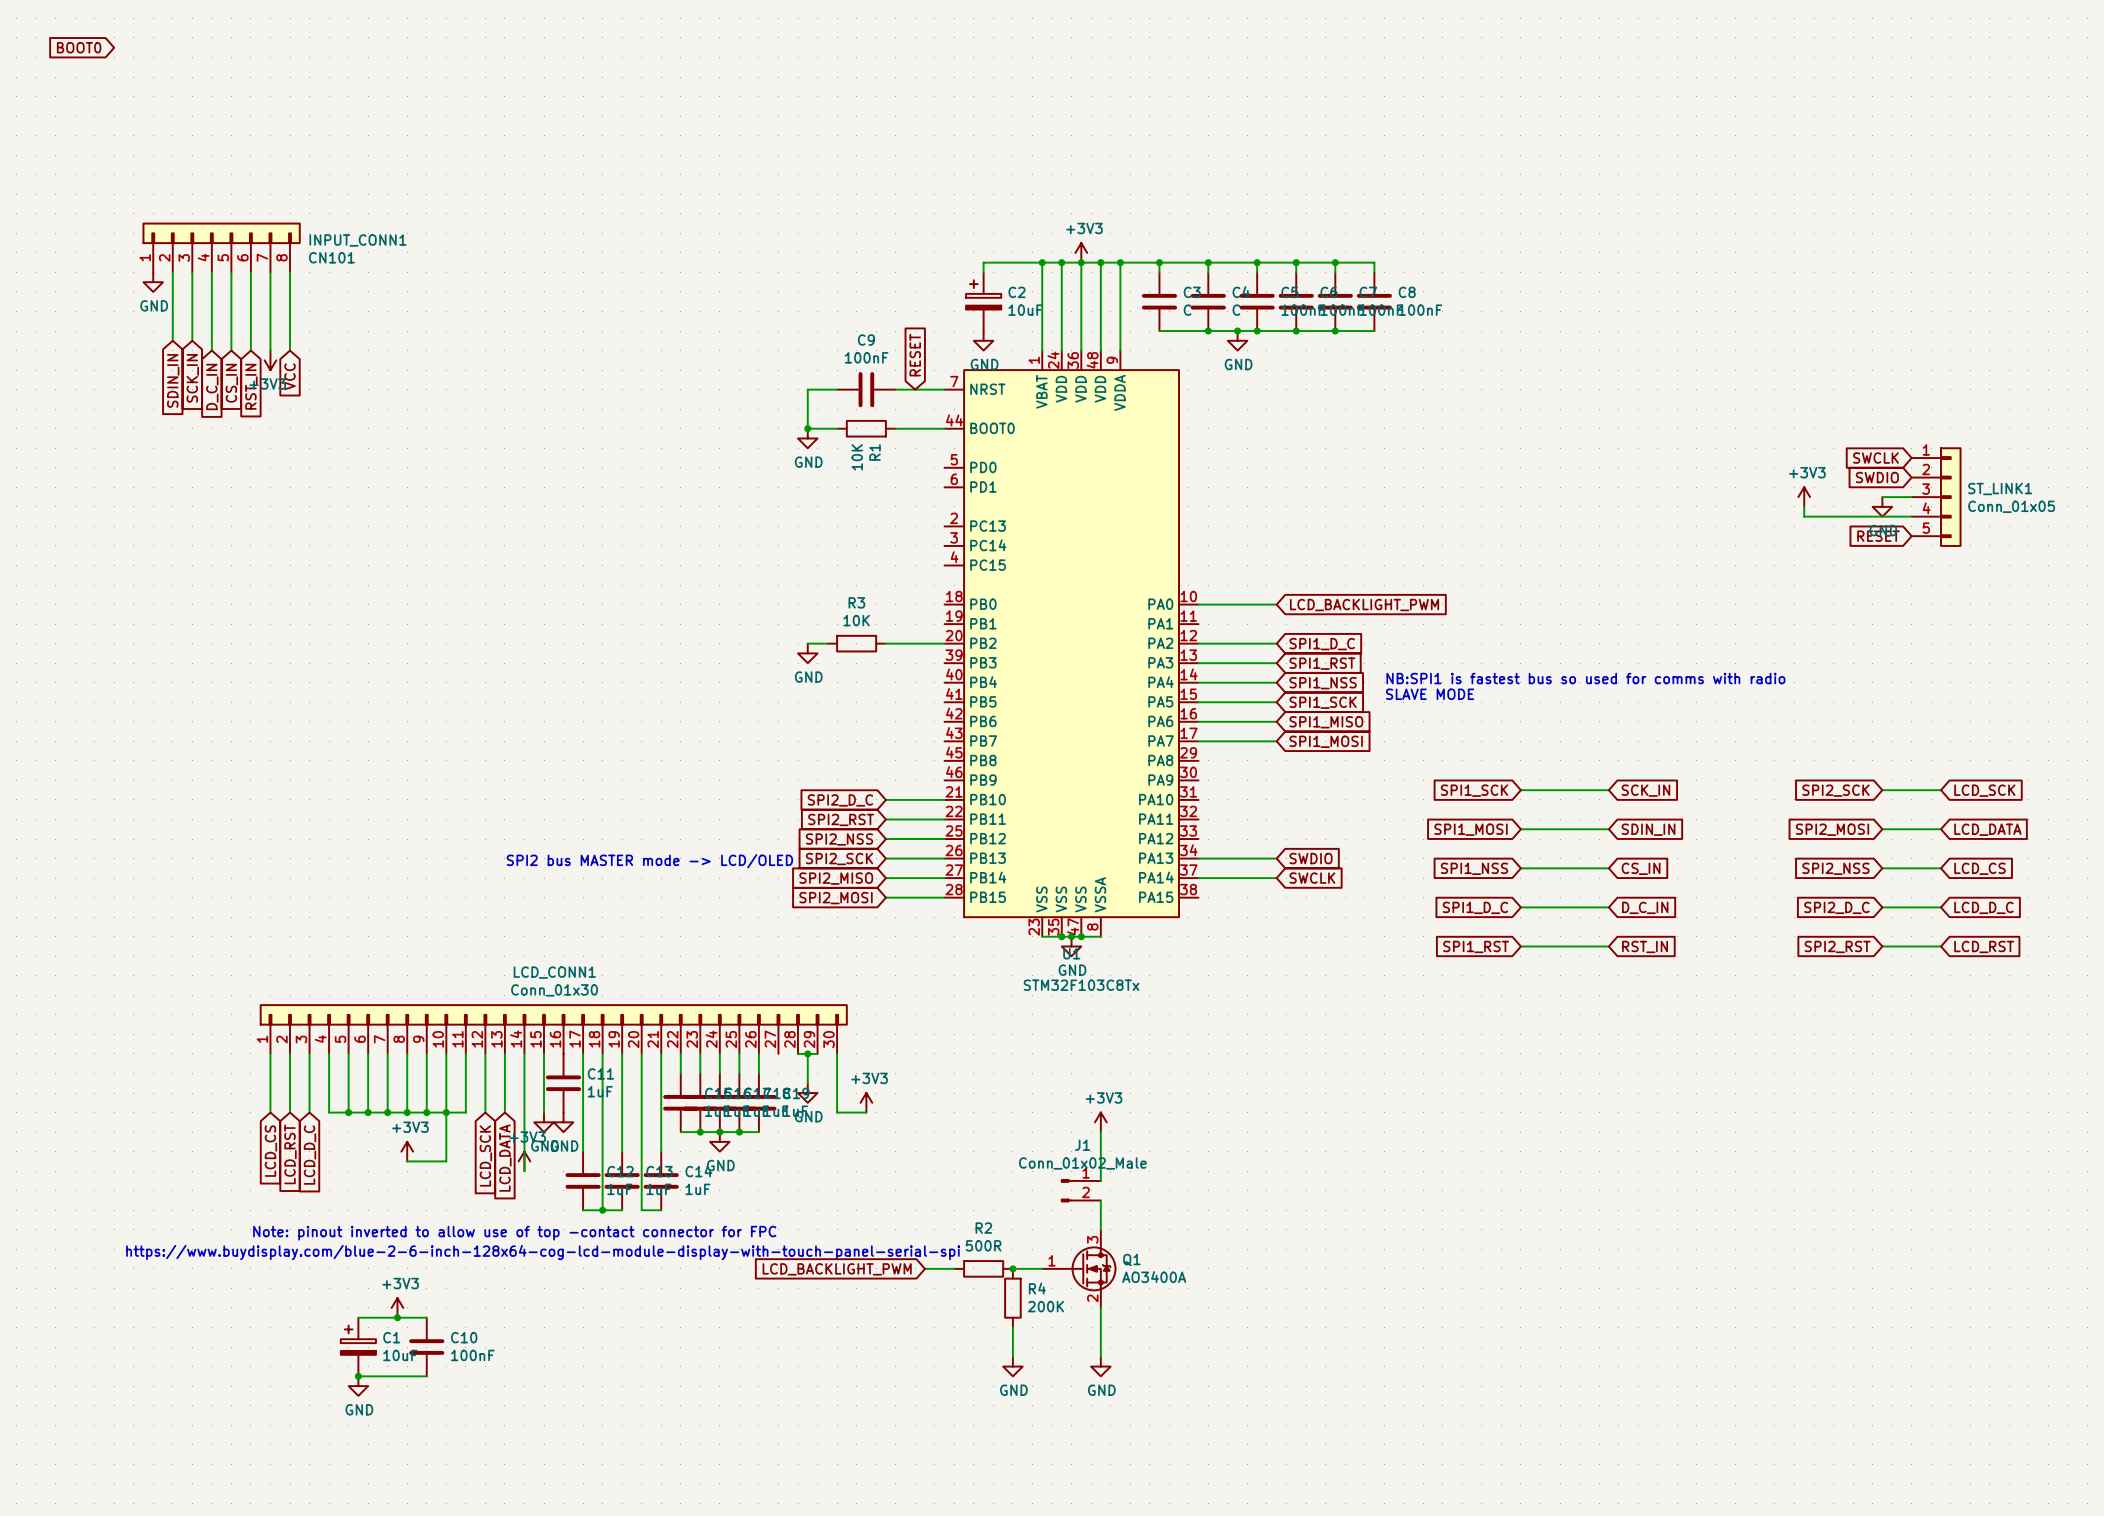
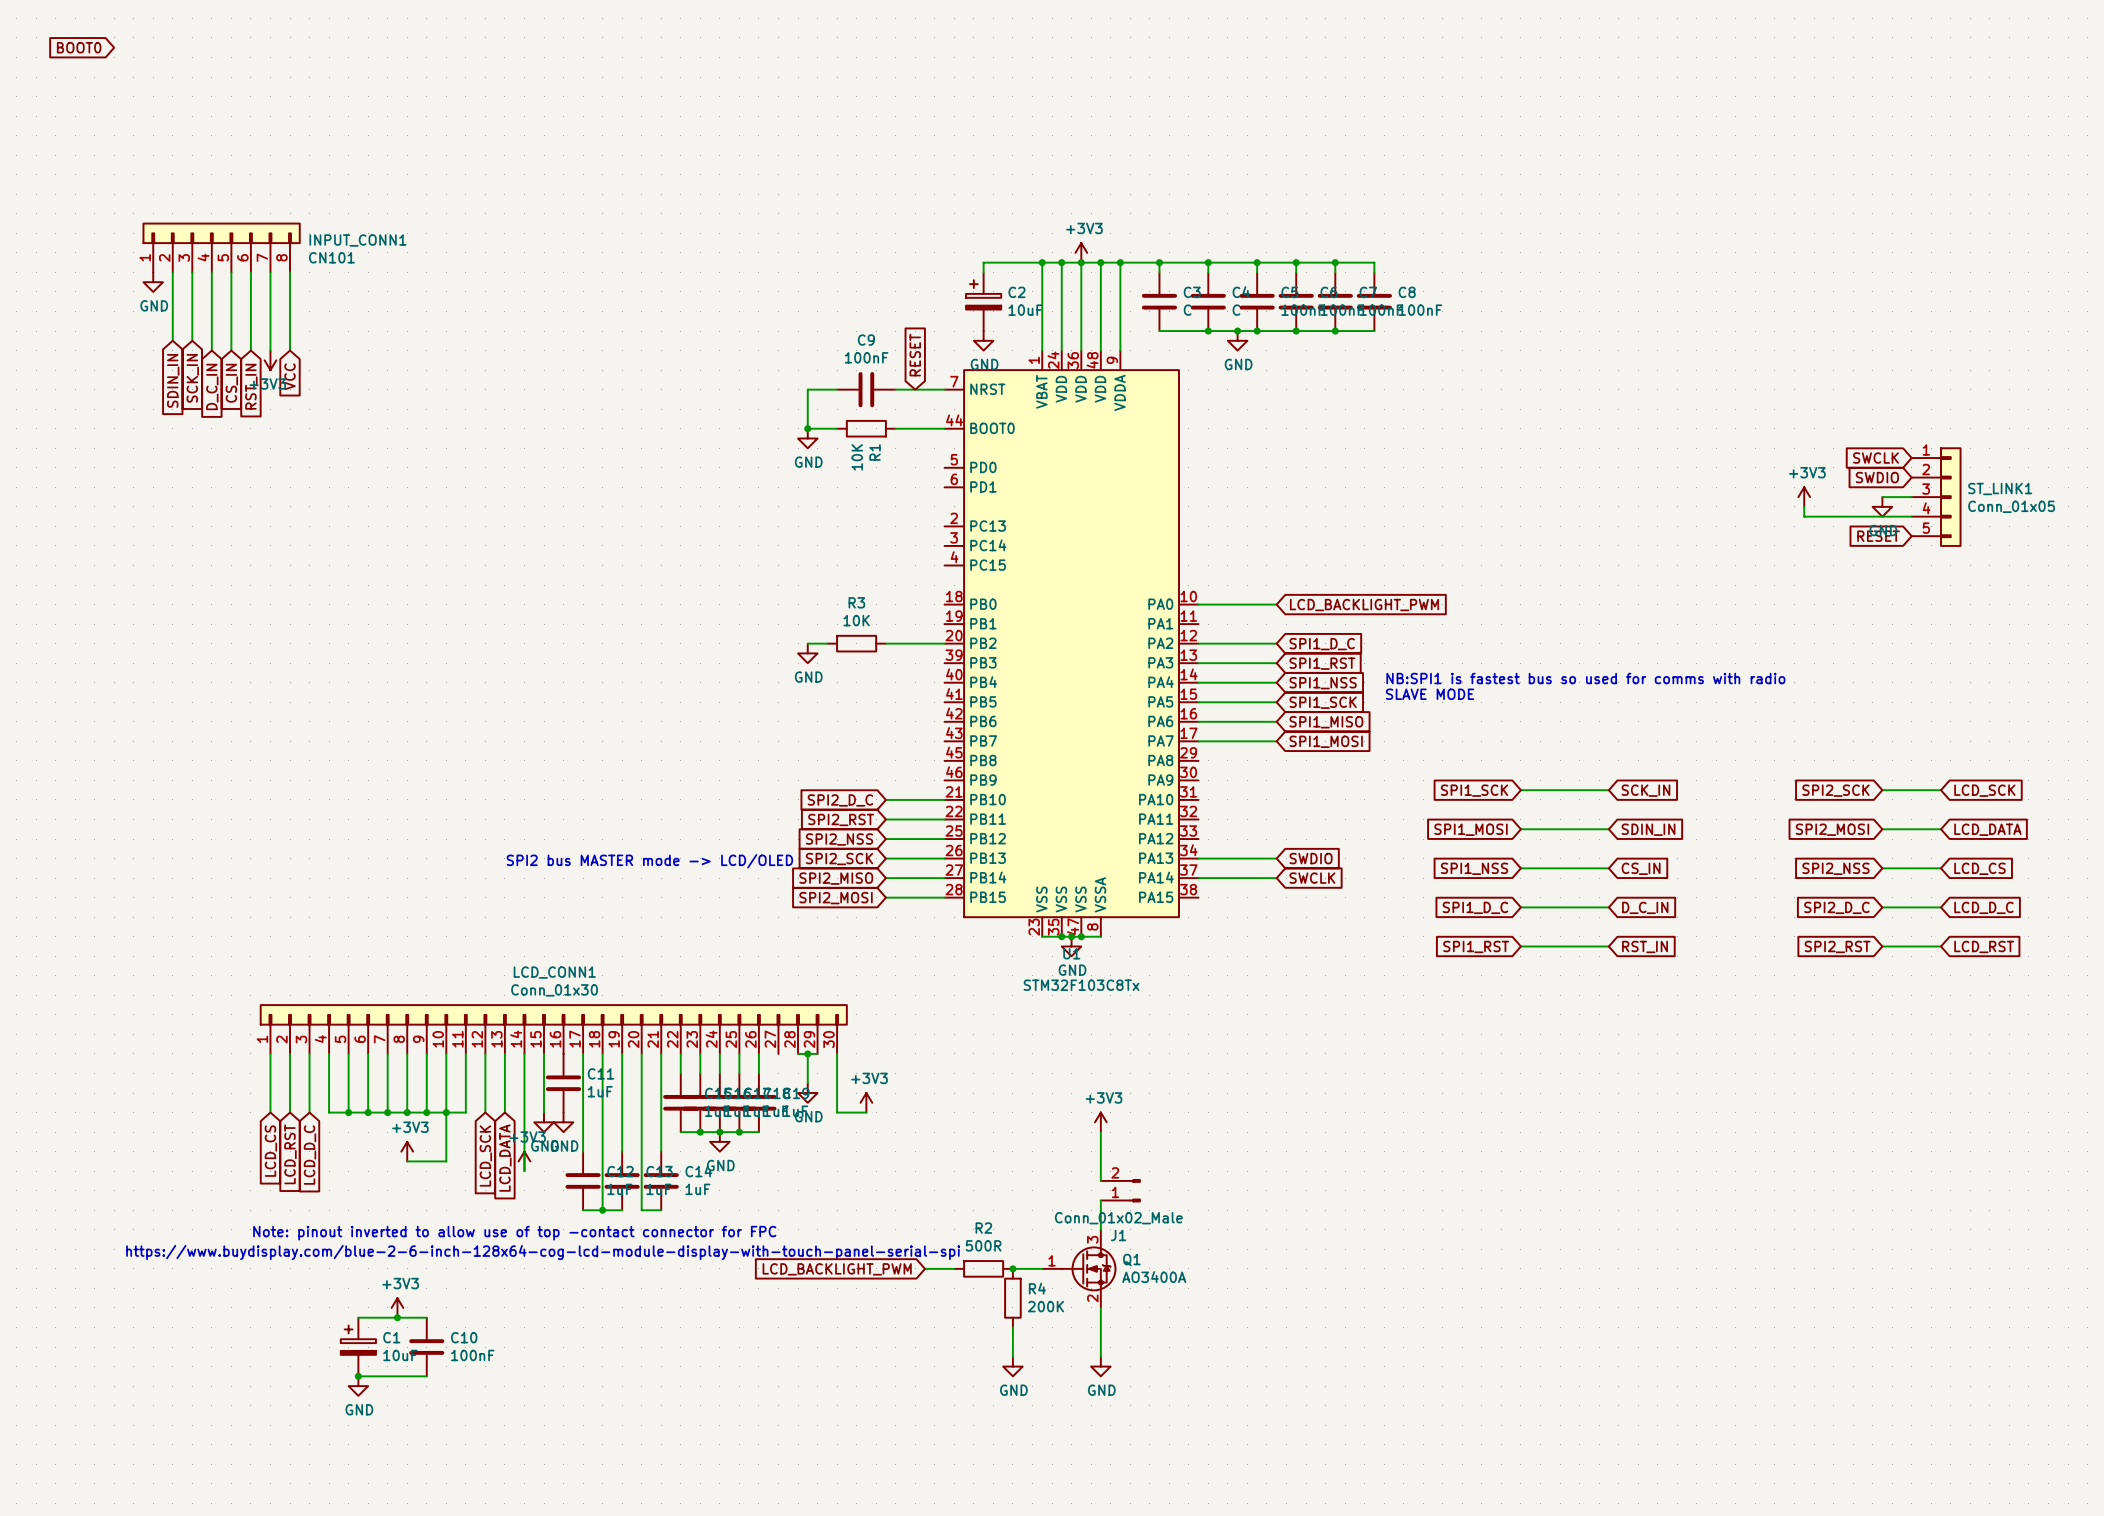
J1 rotation: 0° (1066, 1190) -> 180° (1135, 1190)
J1 position: (1081, 1190) -> (1120, 1190)

